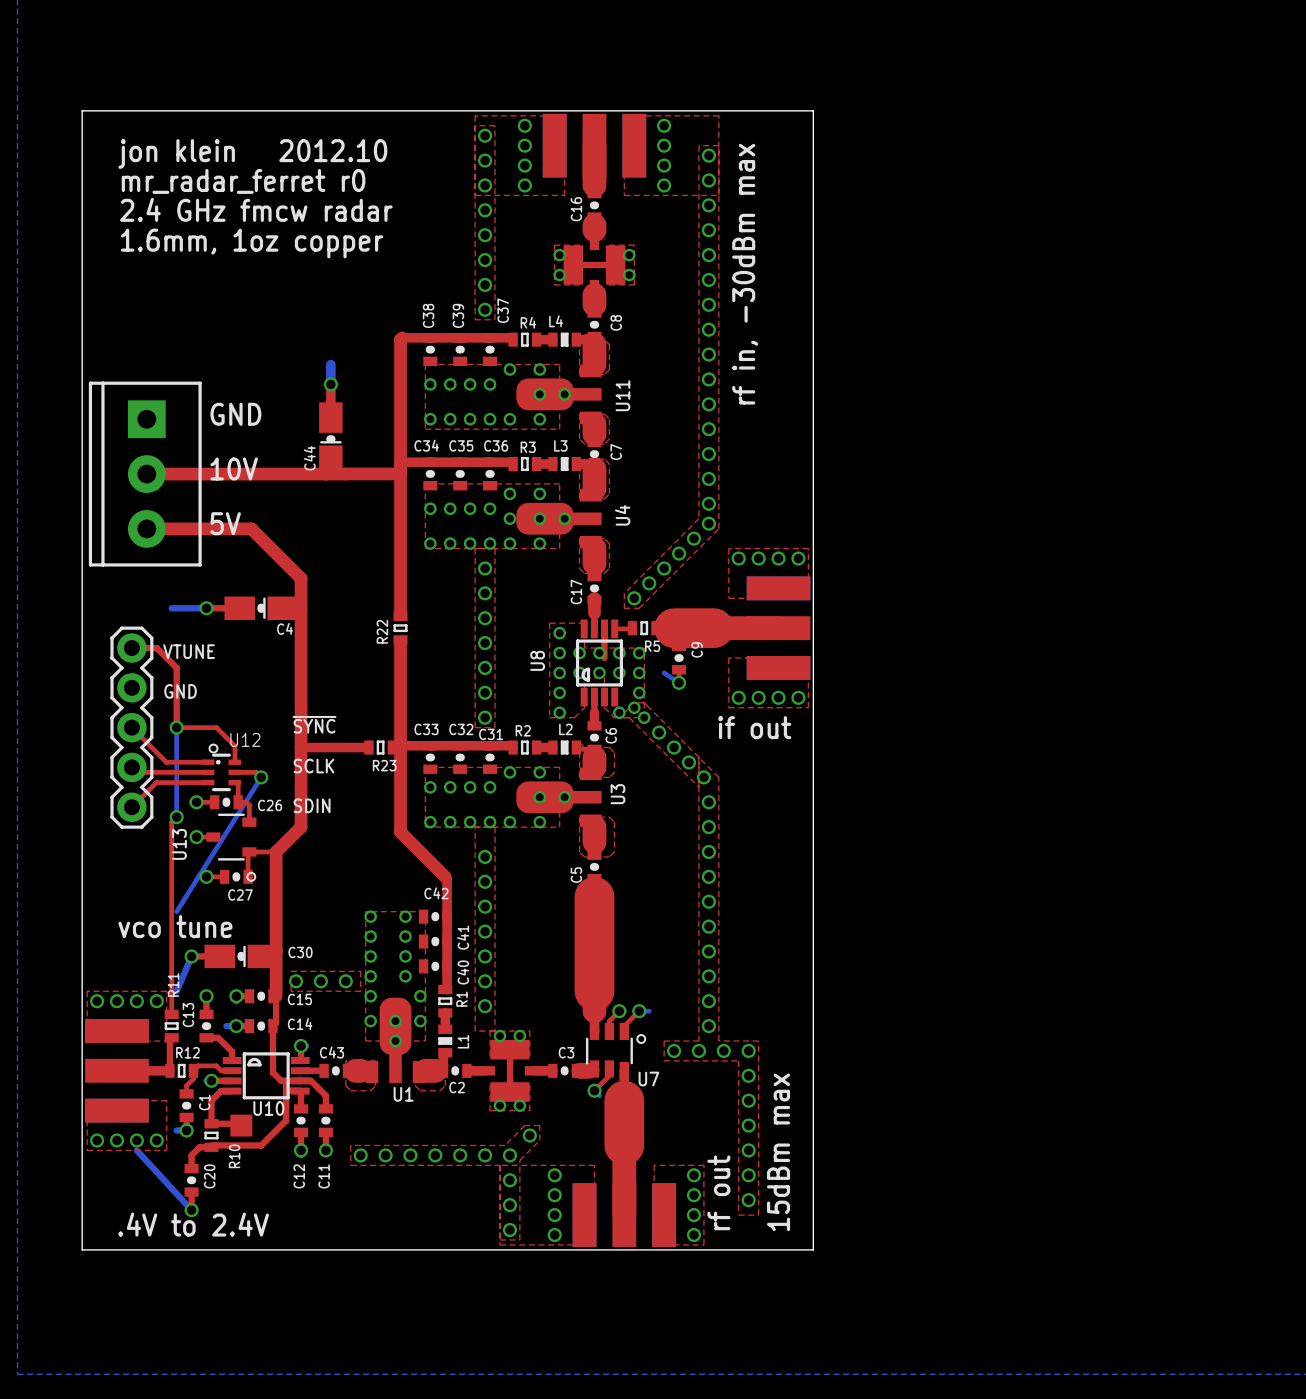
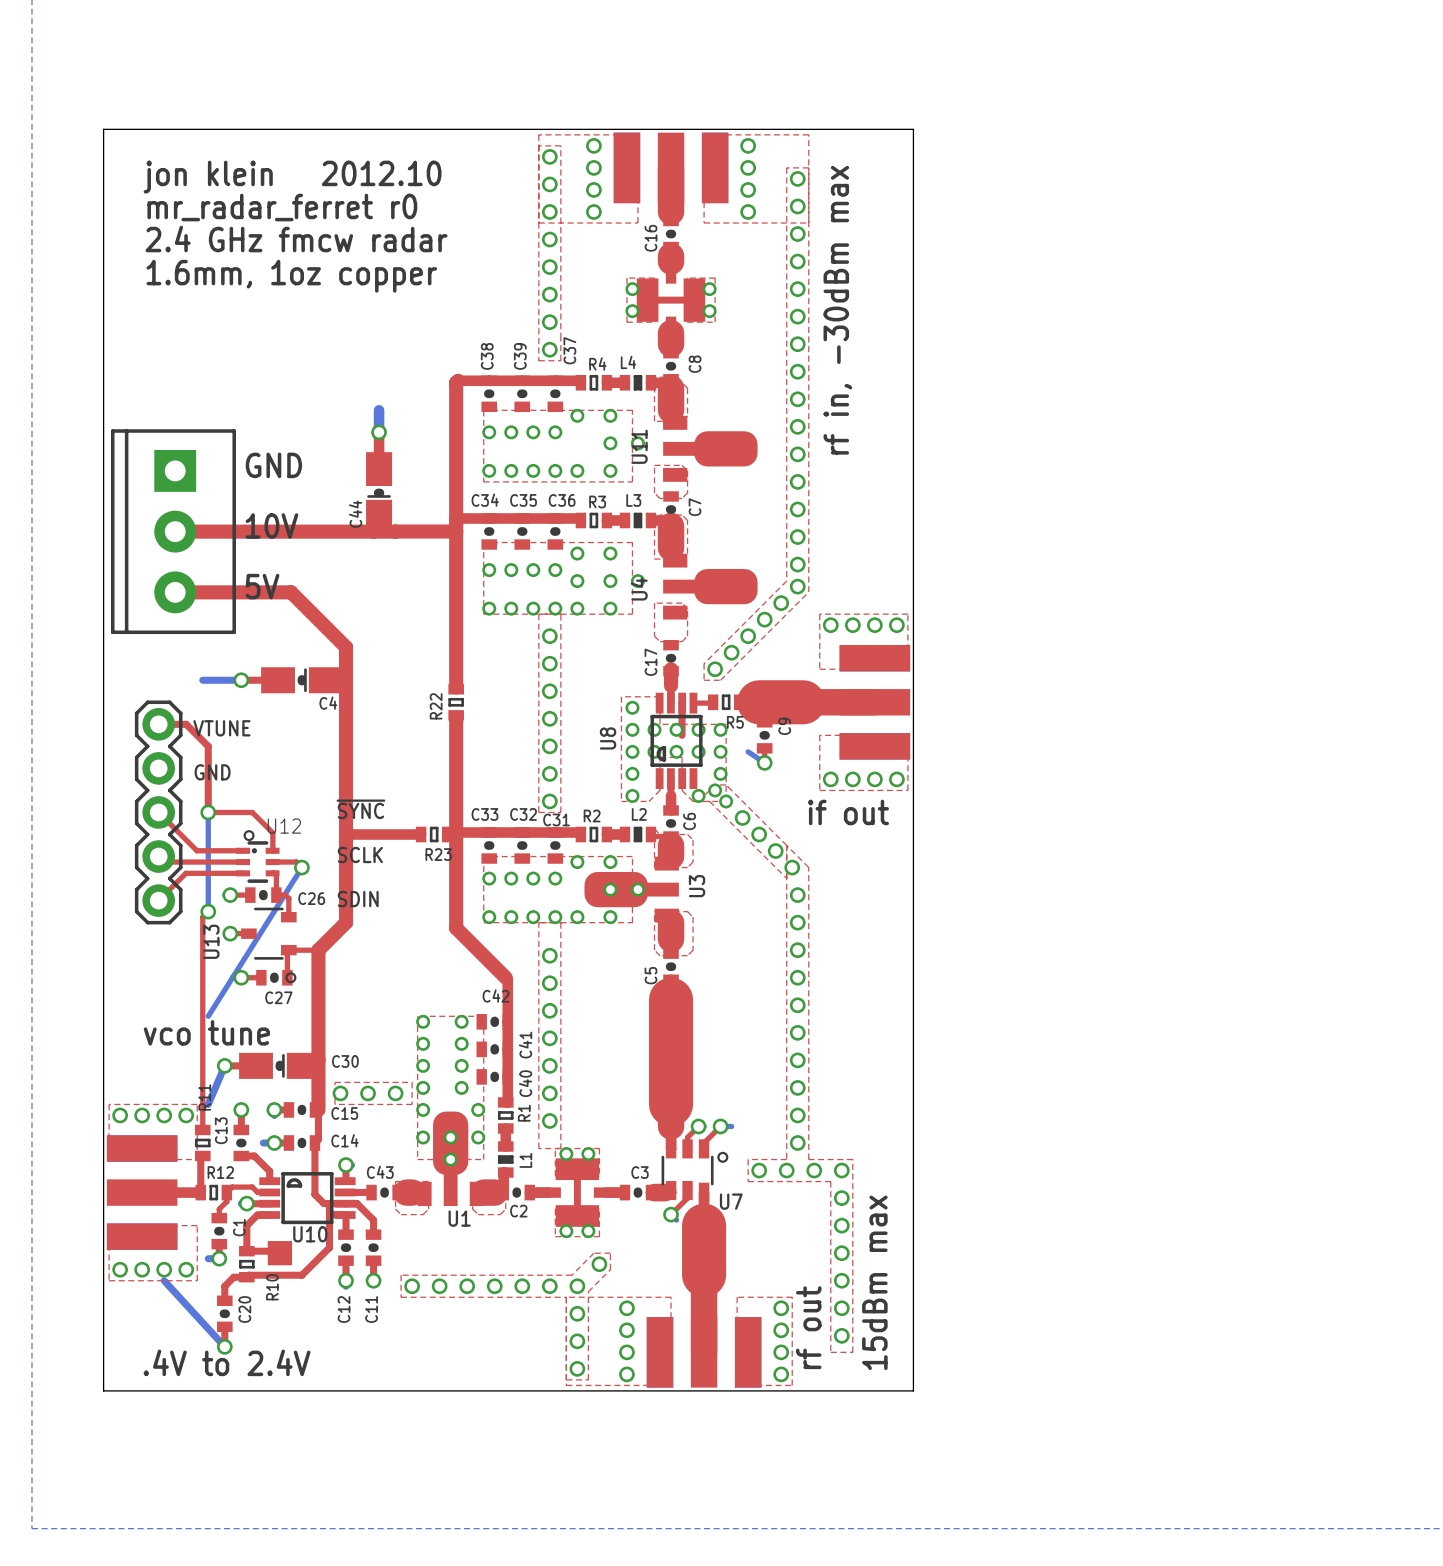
U11 rotation: 0° (559, 394) -> 180° (710, 448)
U11 position: (559, 394) -> (710, 448)
top track: (590, 417) (594, 424) (594, 442) -> none
U4 rotation: 0° (559, 518) -> 180° (710, 586)
U4 position: (559, 518) -> (710, 586)
top track: (590, 542) (594, 546) (594, 576) -> none

